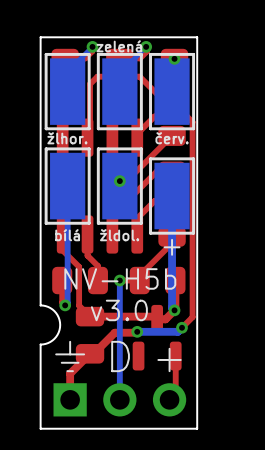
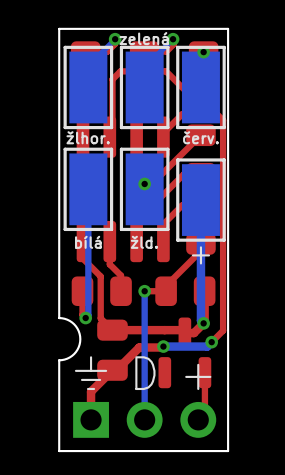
text: žldol. (119, 235) -> žld. (144, 242)
text: NV-H5b (120, 278) -> none
text: v3.0 (119, 310) -> none

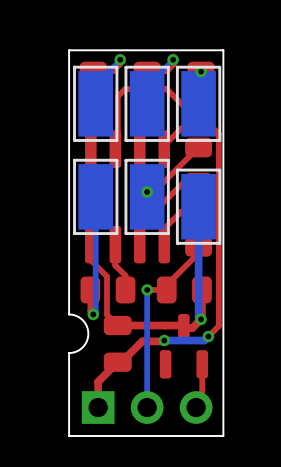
text: zelená (144, 38) -> none
text: žlhor. (88, 137) -> none
text: červ. (200, 137) -> none
text: bílá (88, 242) -> none
text: žld. (144, 242) -> none
text: + (200, 255) -> none
text: ⏚ (91, 373) -> none
text: D (145, 373) -> none
text: + (198, 376) -> none

